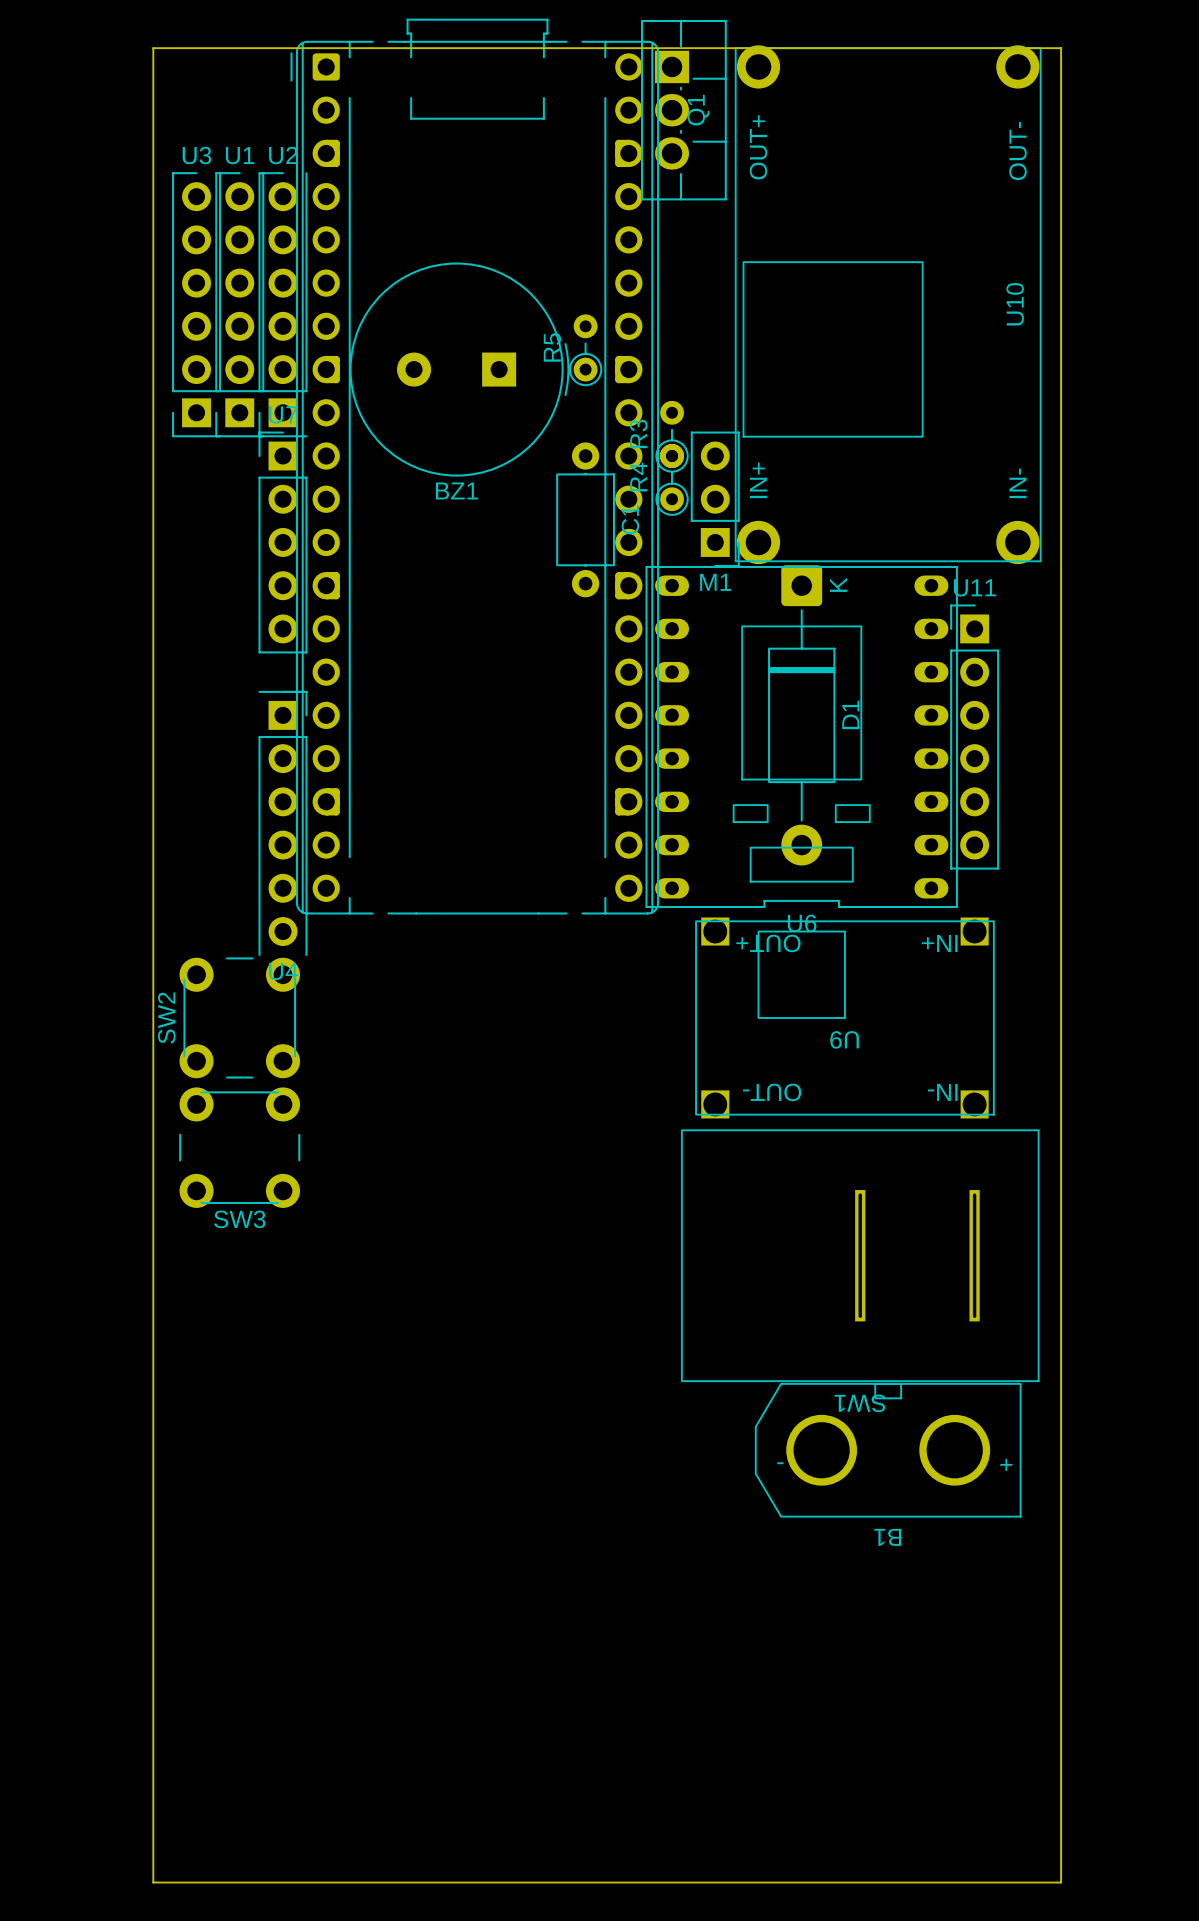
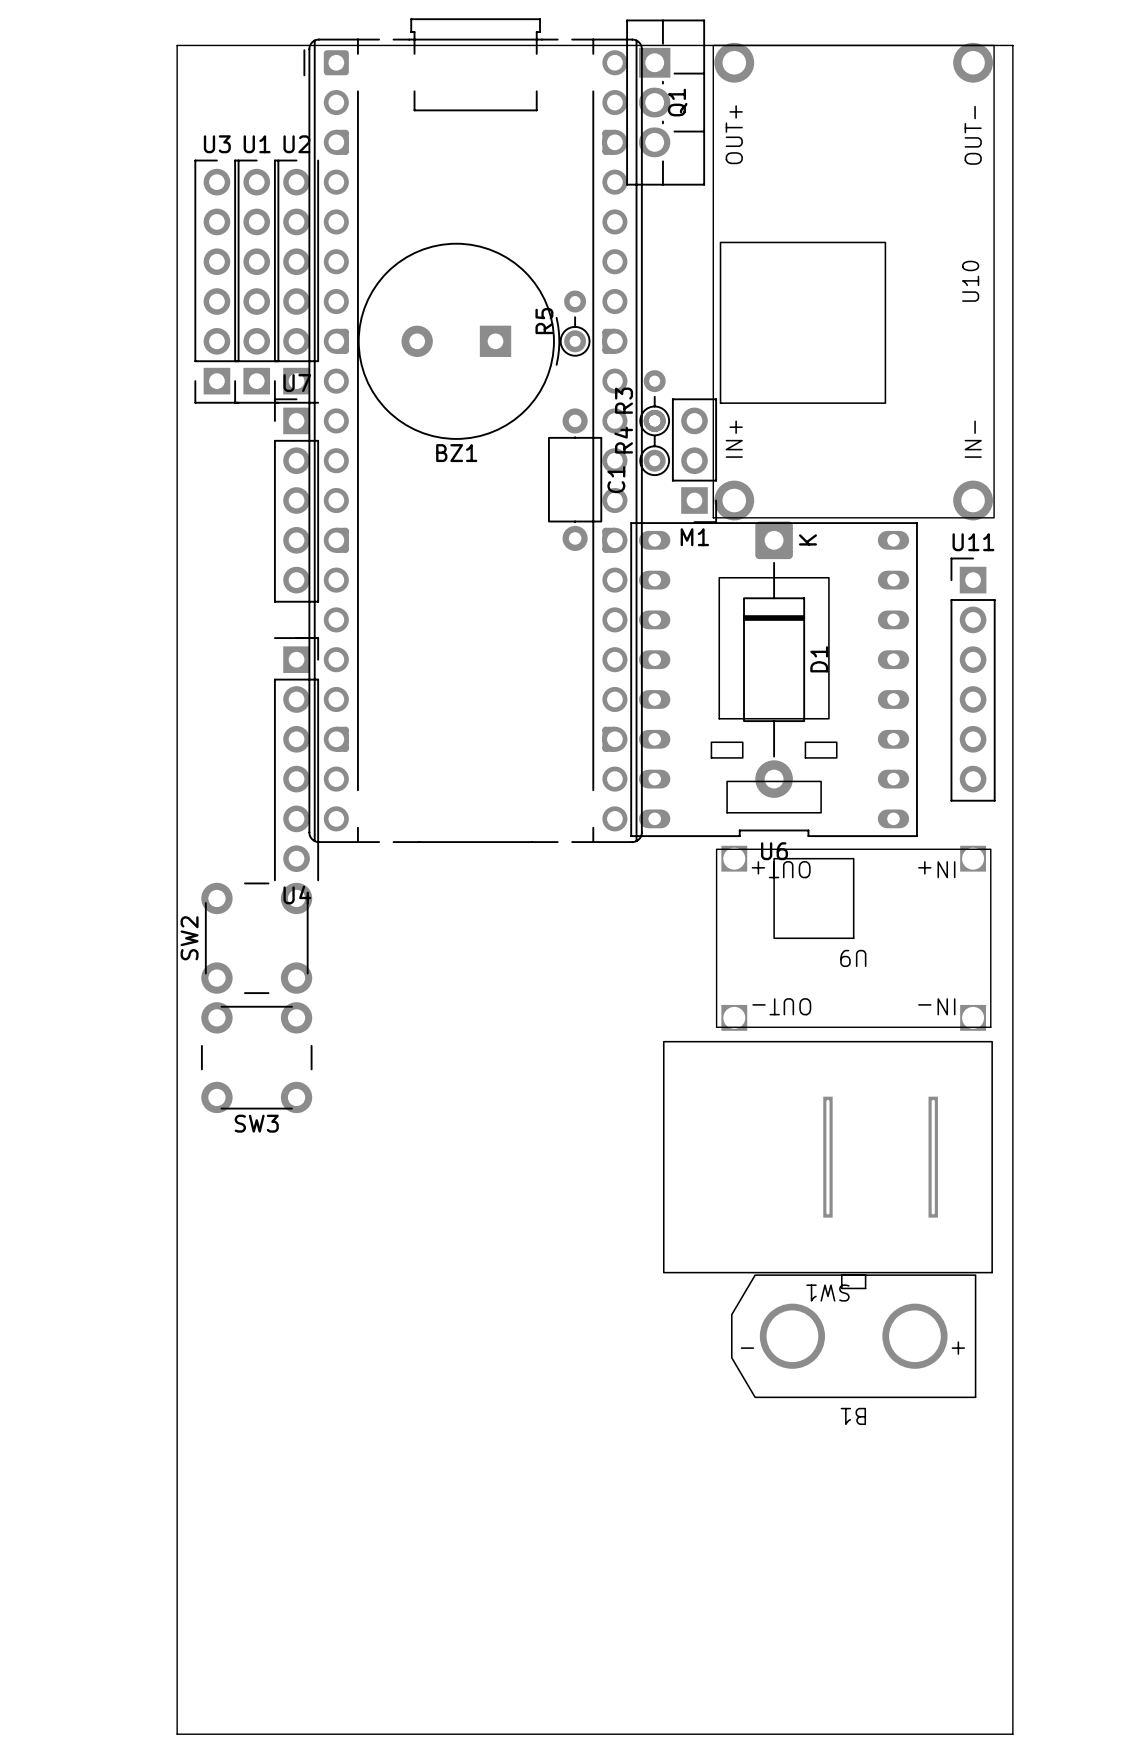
U11 position: (974, 737) -> (973, 679)
U9 position: (844, 1017) -> (853, 938)

